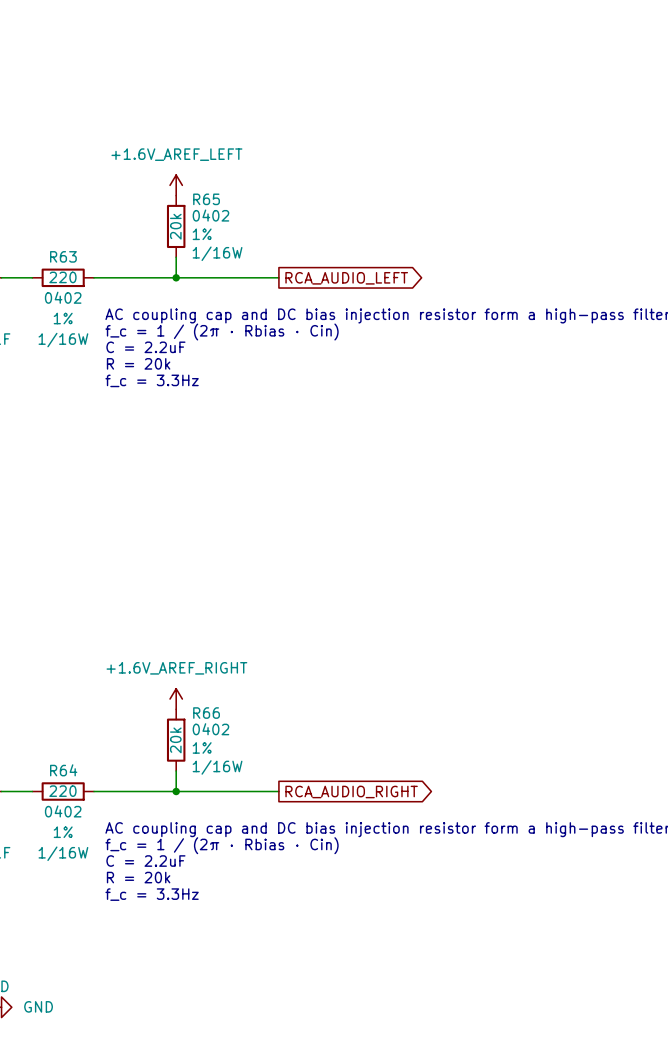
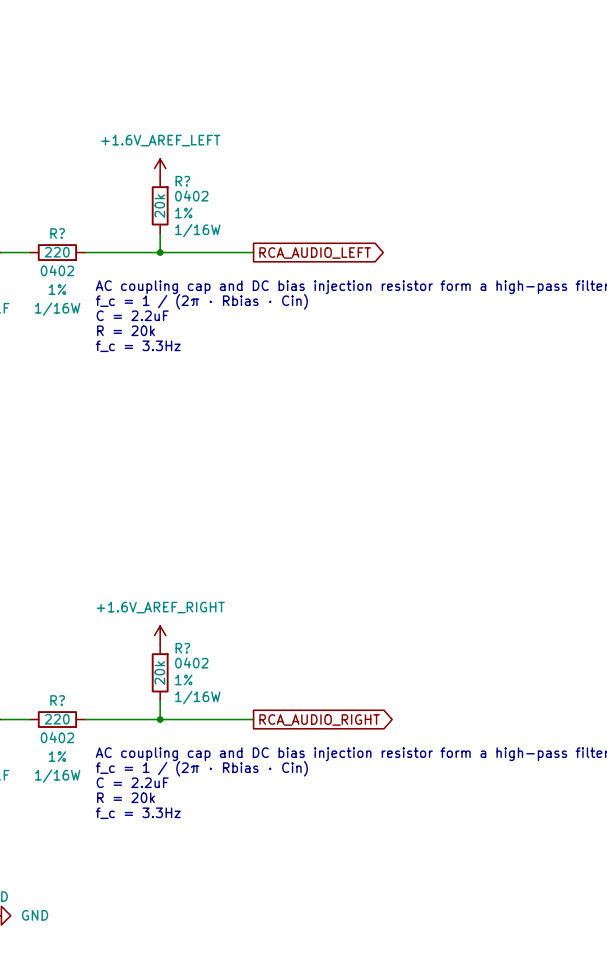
R65 name: R65 (206, 199) -> R? (182, 181)
R63 name: R63 (63, 256) -> R? (57, 233)
R66 name: R66 (206, 713) -> R? (182, 648)
R64 name: R64 (63, 770) -> R? (57, 700)

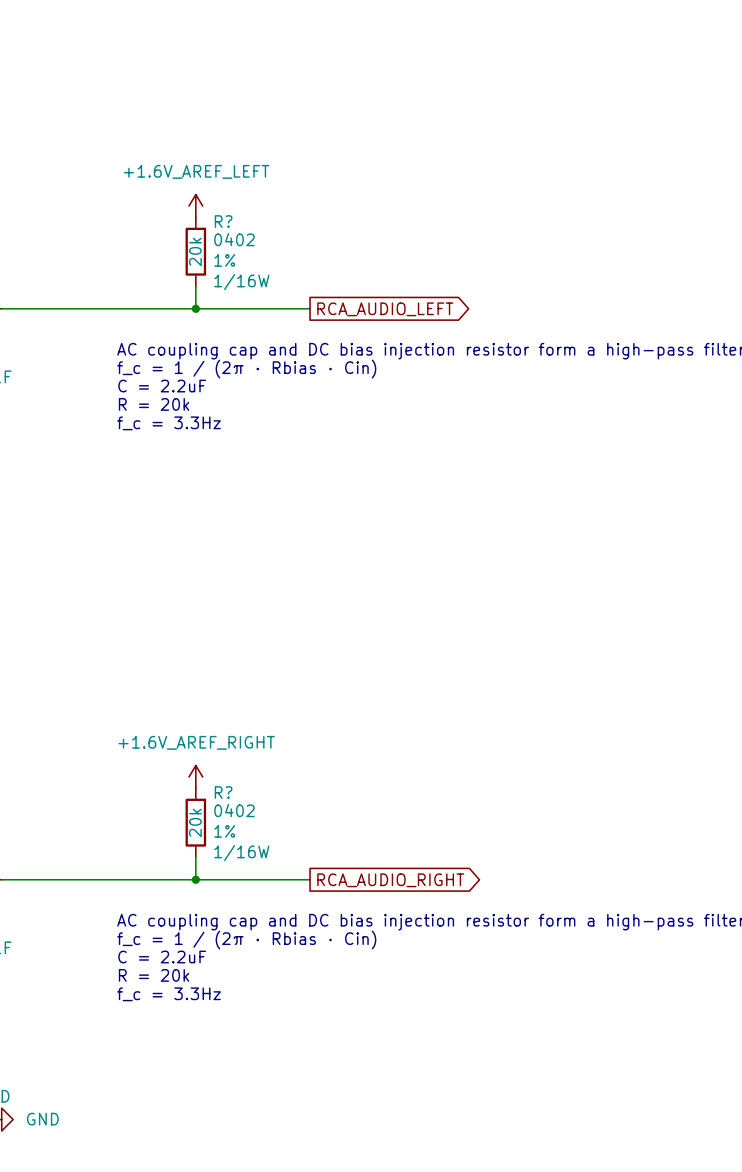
wire: none -> (35, 308) (104, 308)
R?: 220 (57, 252) -> none
wire: none -> (35, 879) (104, 879)
R?: 220 (57, 719) -> none

